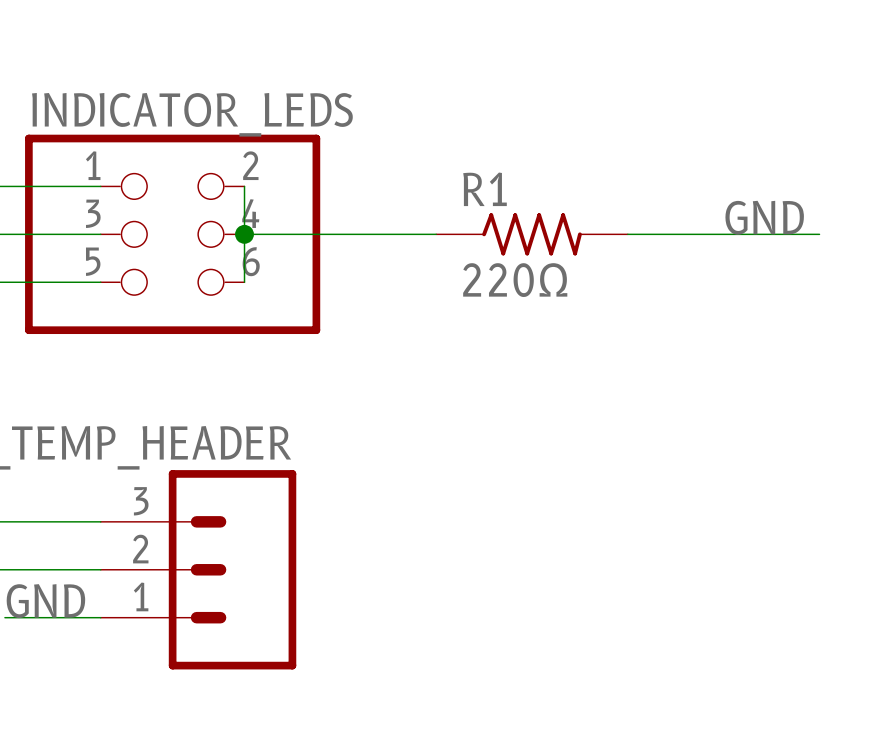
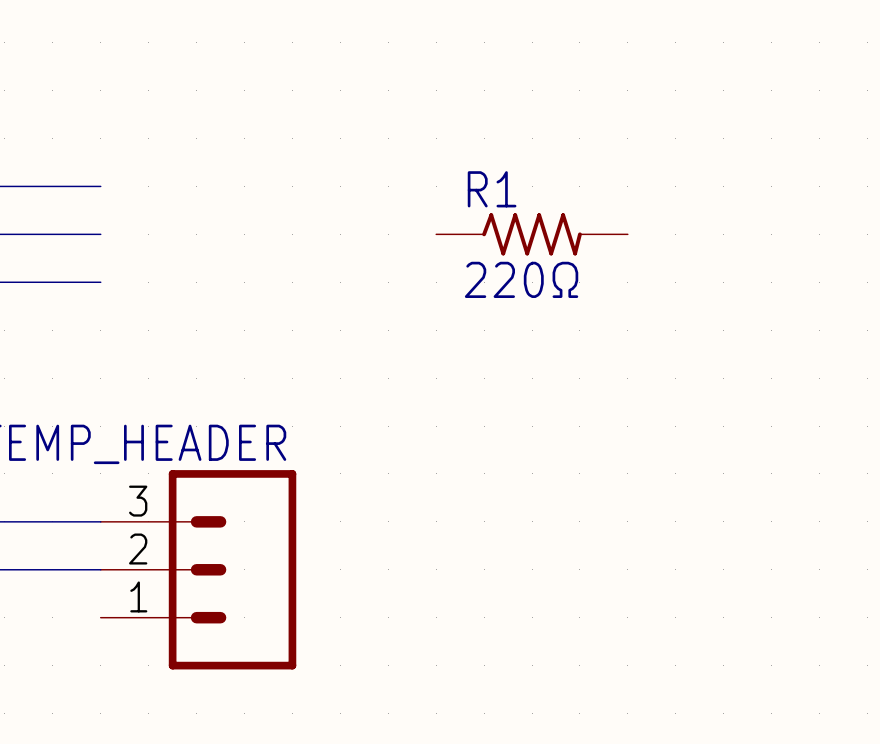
wire: (244, 186) (244, 282) -> none
label: GND (764, 217) -> none
INDICATOR_LEDS: (172, 234) -> none
wire: (244, 234) (436, 234) -> none
junction: (244, 234) -> none
wire: (627, 234) (819, 234) -> none
label: GND (45, 601) -> none
wire: (4, 617) (100, 617) -> none

